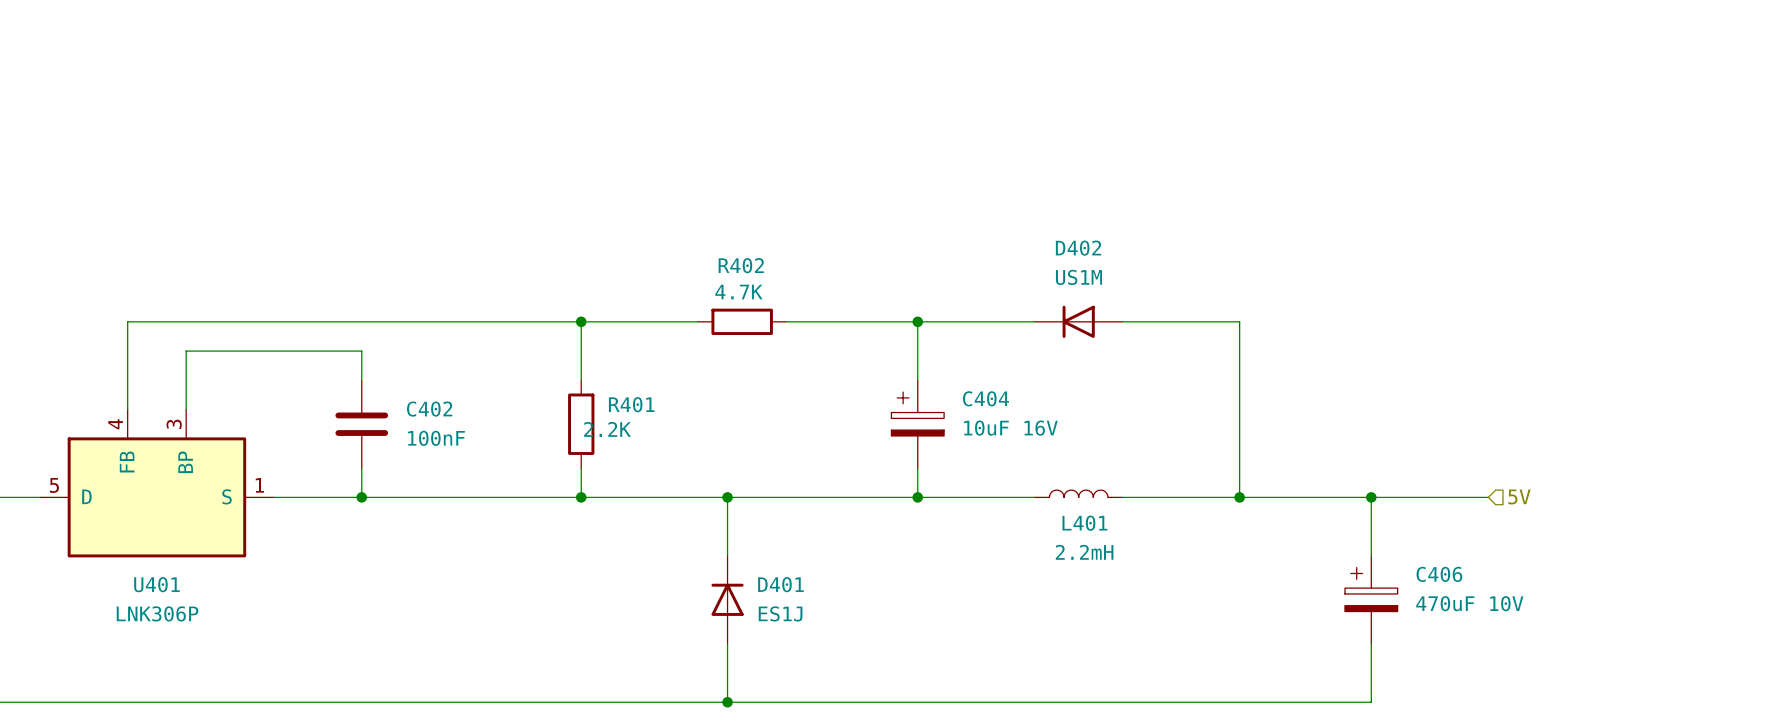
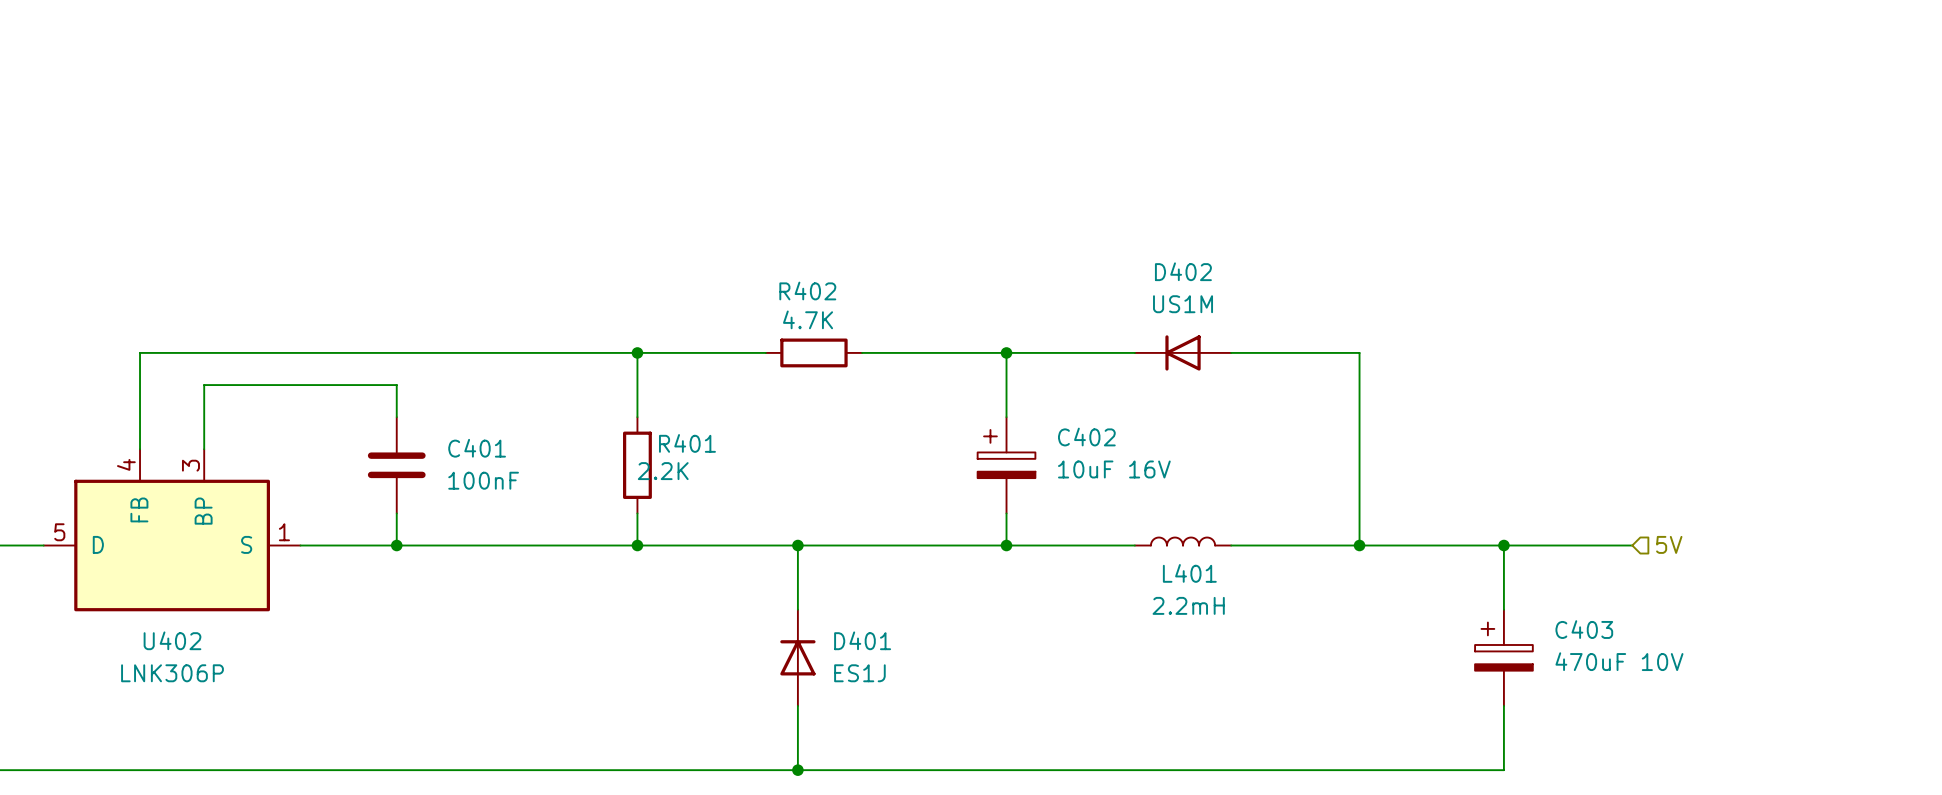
C404 name: C404 (986, 398) -> C402 (1086, 437)
C402 name: C402 (429, 409) -> C401 (477, 448)
C406 name: C406 (1439, 574) -> C403 (1584, 629)
U401 name: U401 (156, 584) -> U402 (172, 640)

